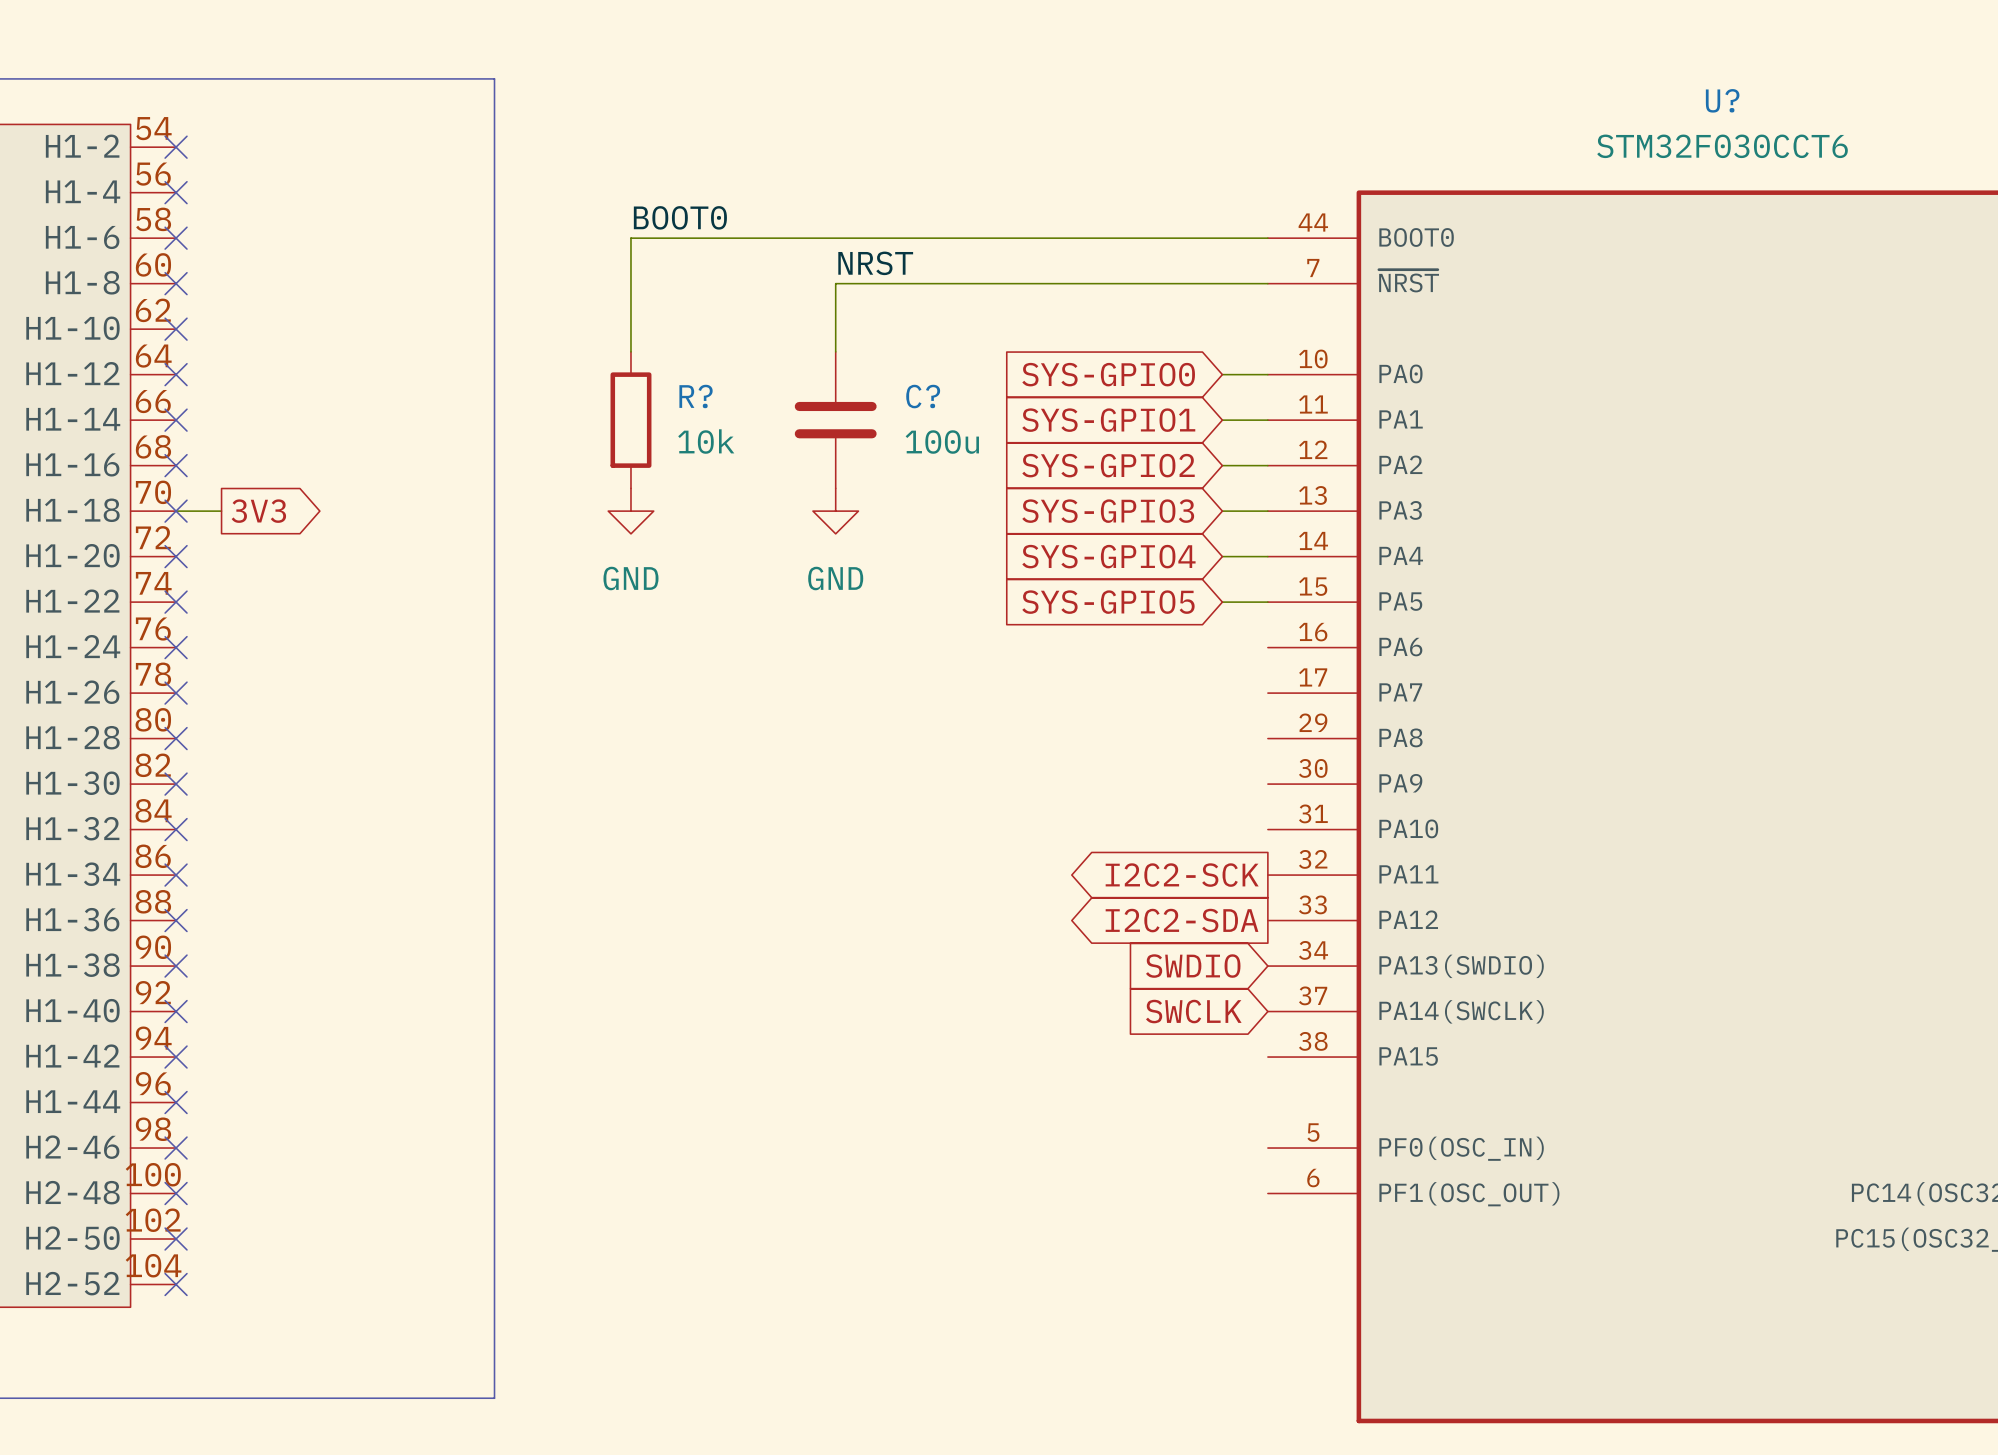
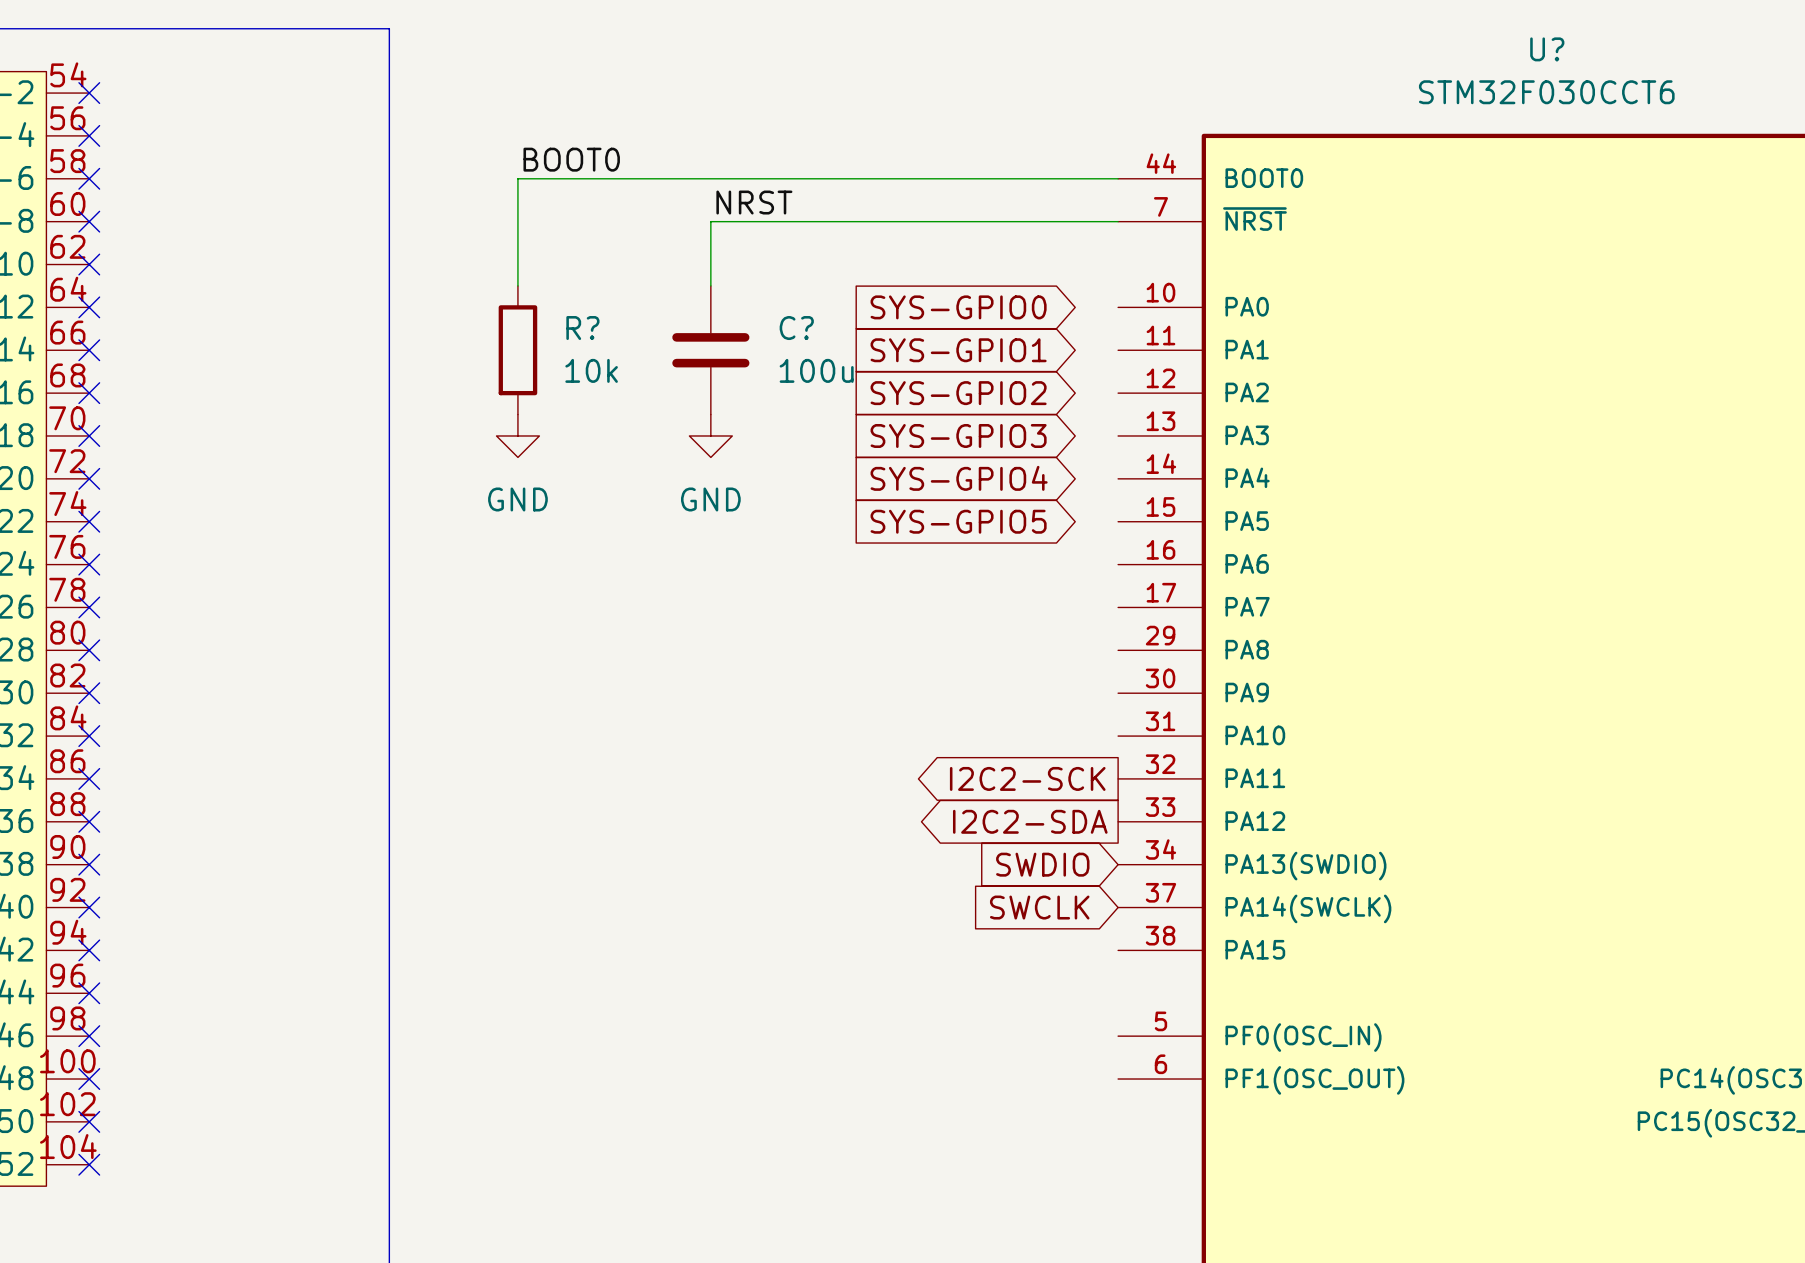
wire: (1222, 374) (1267, 374) -> none
wire: (1222, 420) (1267, 420) -> none
wire: (1222, 465) (1267, 465) -> none
wire: (176, 511) (221, 511) -> none
global label: 3V3 (258, 511) -> none
wire: (1222, 511) (1267, 511) -> none
wire: (1222, 556) (1267, 556) -> none
wire: (1222, 602) (1267, 602) -> none

